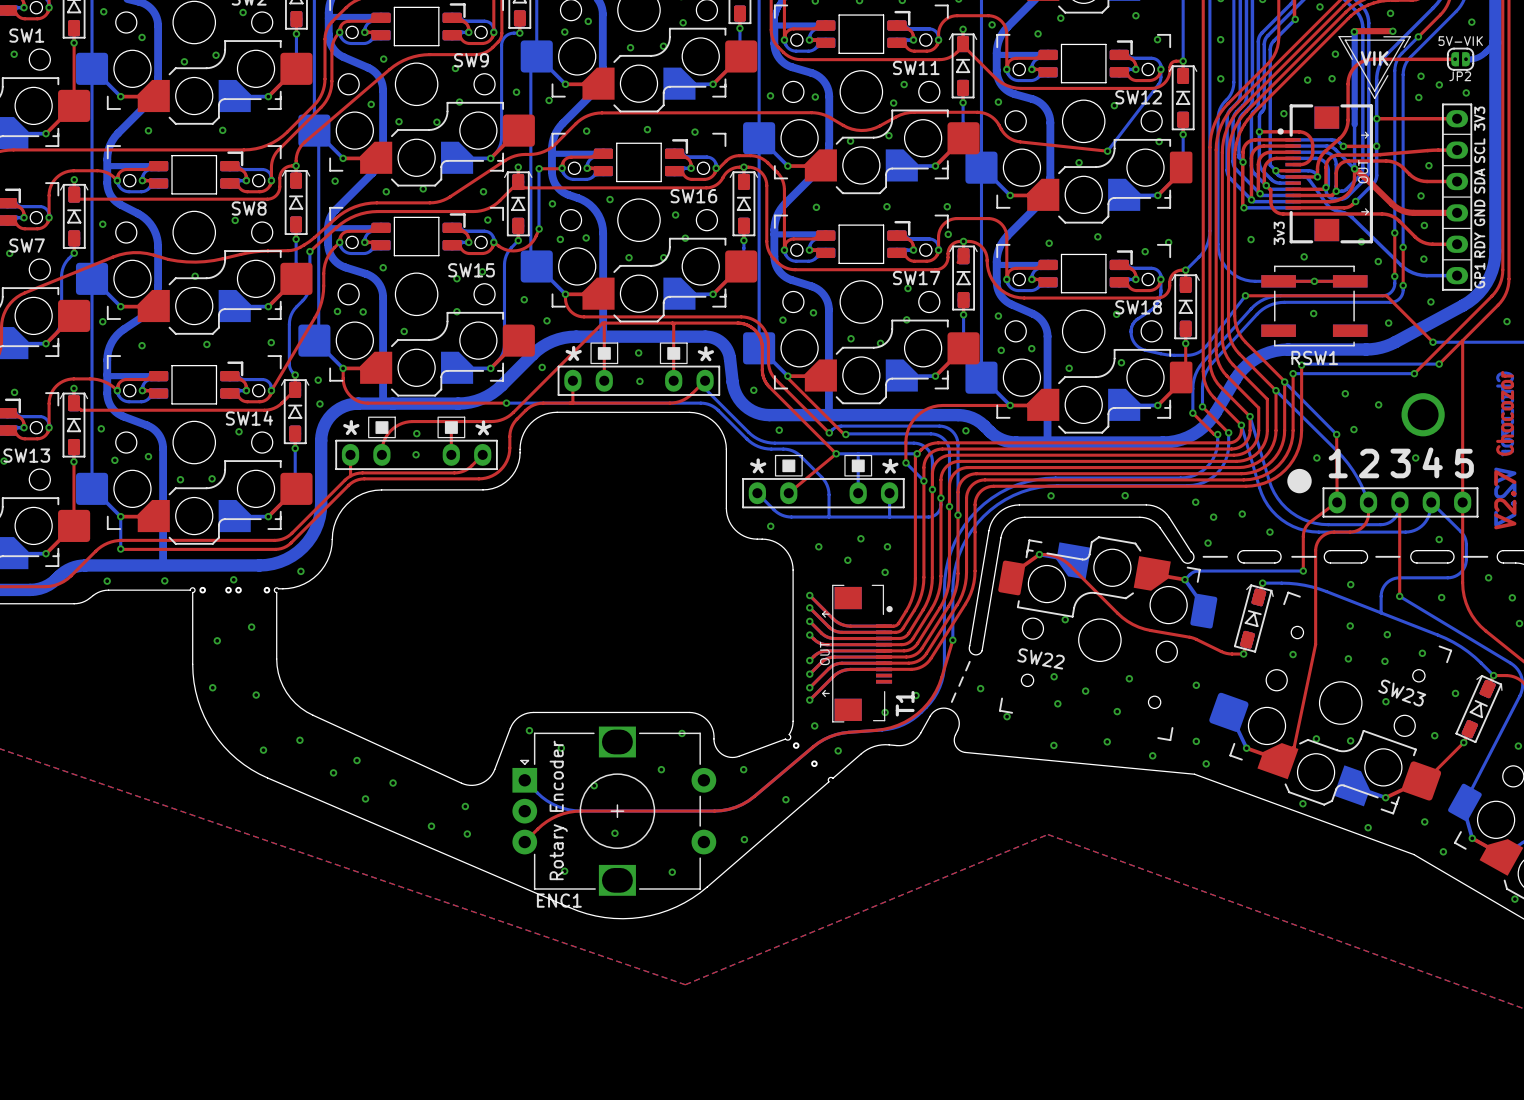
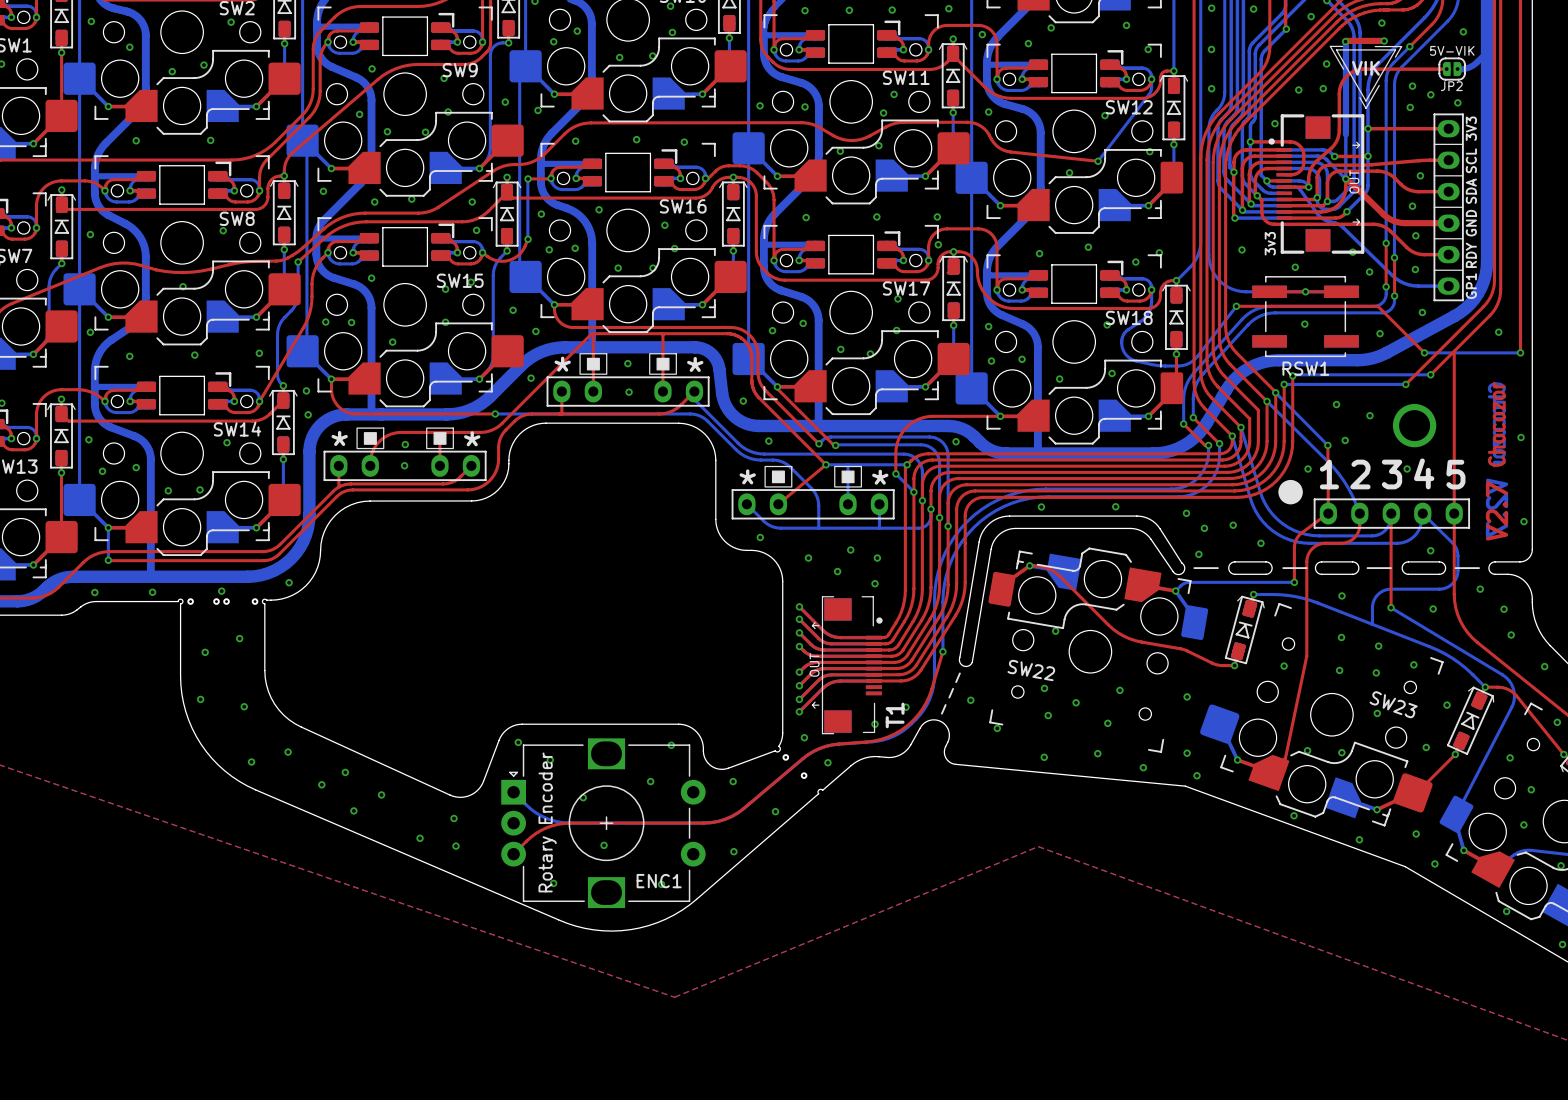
ENC1 name position: ENC1 (559, 900) -> ENC1 (659, 881)

